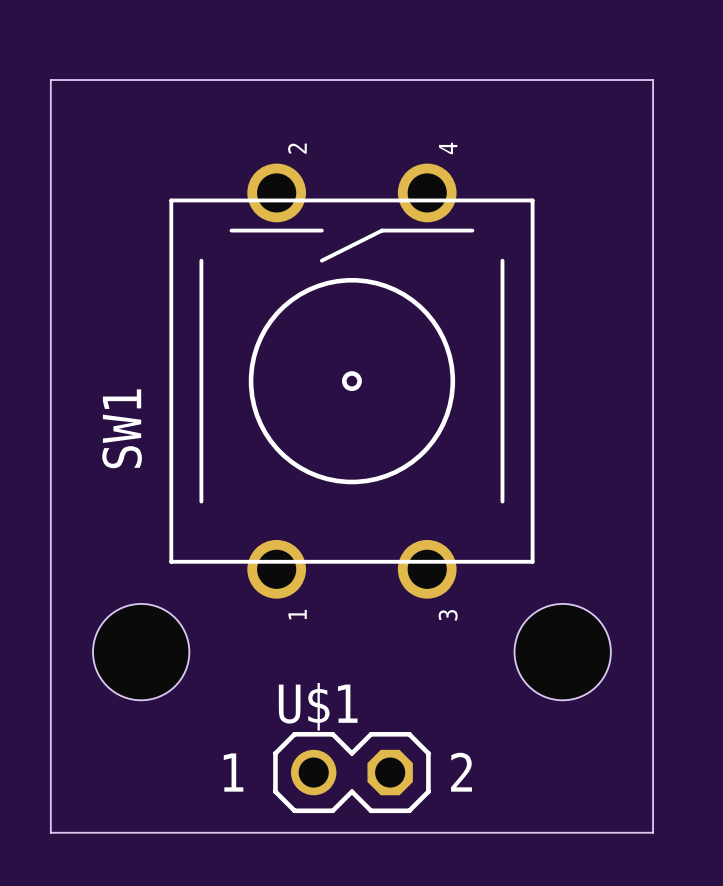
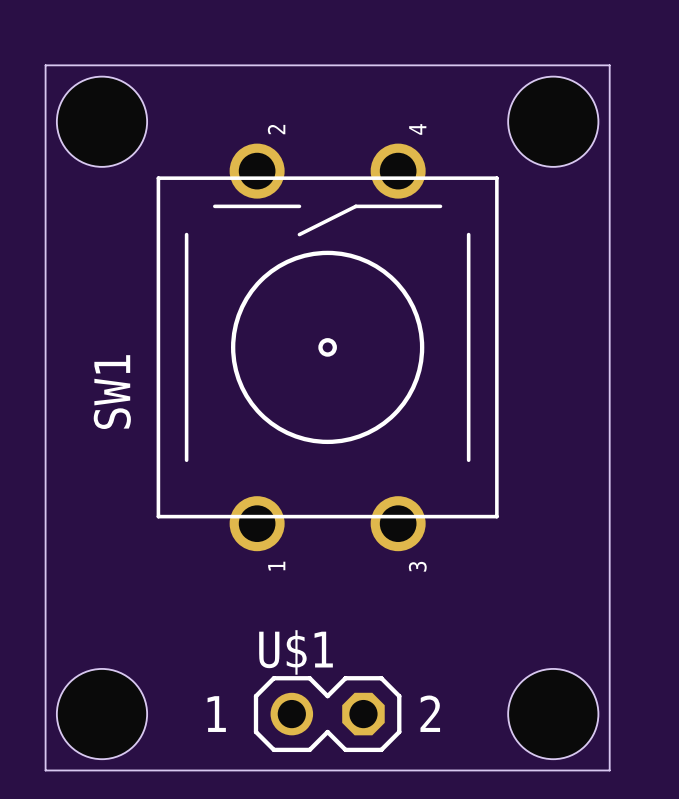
hole: none -> (101, 121)
hole: none -> (553, 121)
hole position: (141, 652) -> (101, 714)
hole position: (562, 652) -> (553, 714)

